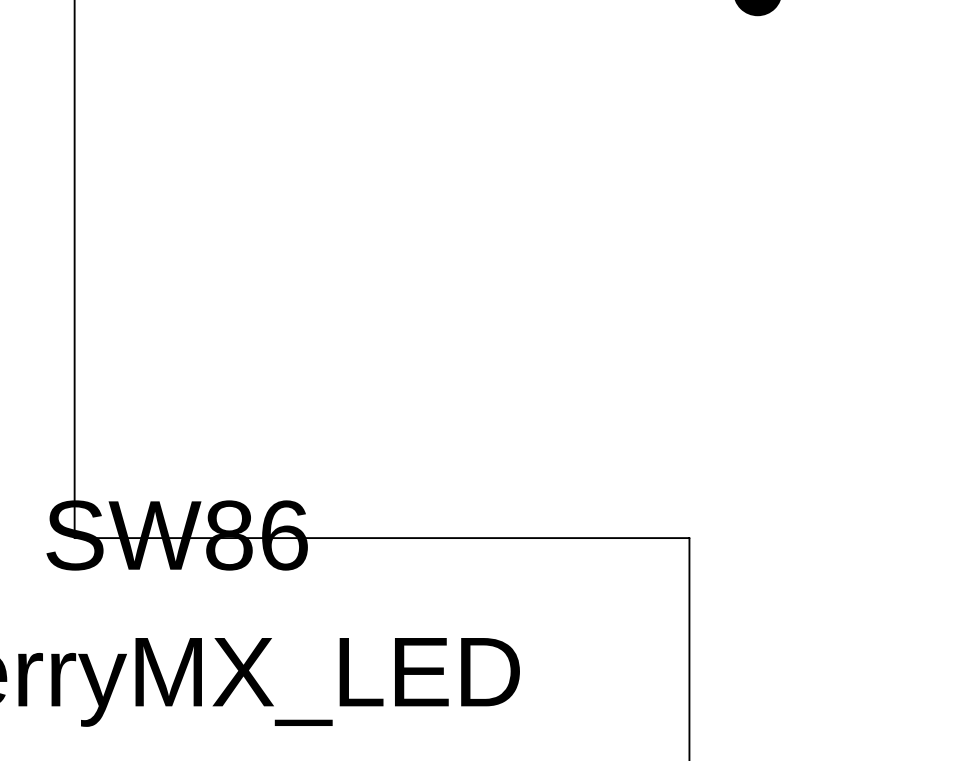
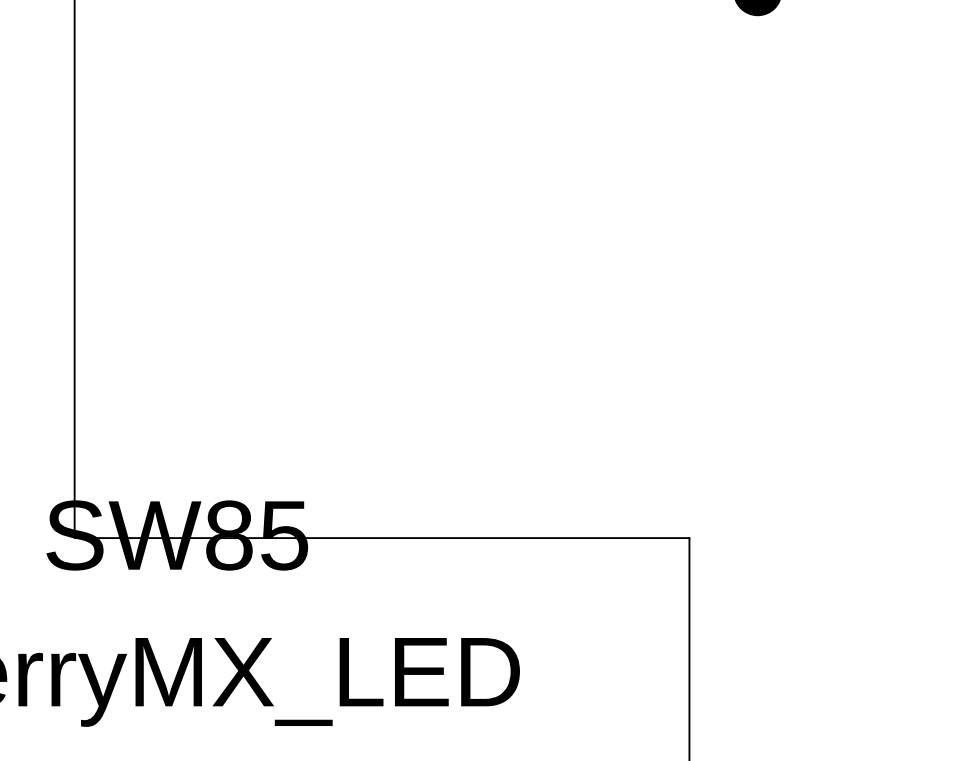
SW86 name: SW86 (177, 535) -> SW85 (177, 535)

